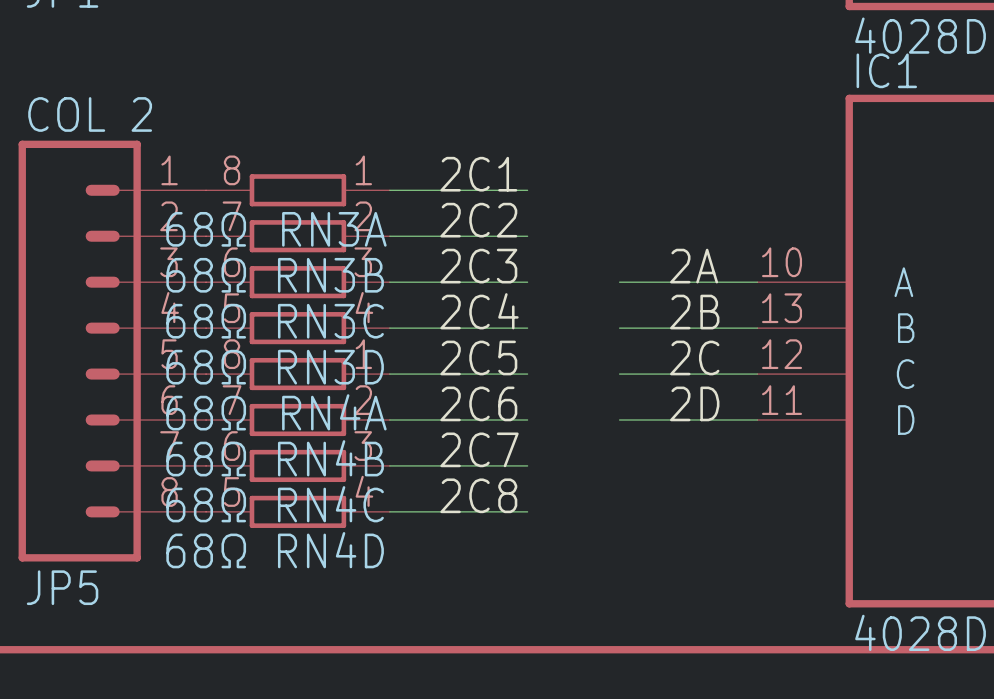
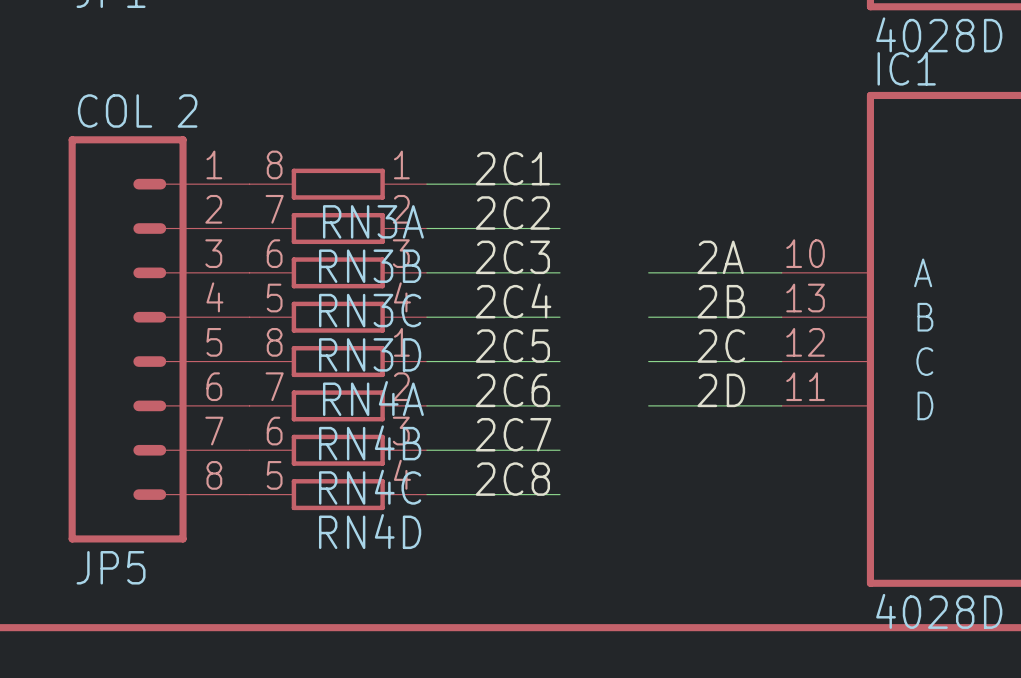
RN3A value: 68Ω (206, 229) -> none
RN3B value: 68Ω (206, 275) -> none
RN3C value: 68Ω (206, 321) -> none
RN3D value: 68Ω (206, 367) -> none
RN4A value: 68Ω (206, 413) -> none
RN4B value: 68Ω (206, 459) -> none
RN4C value: 68Ω (206, 504) -> none
RN4D value: 68Ω (206, 550) -> none

